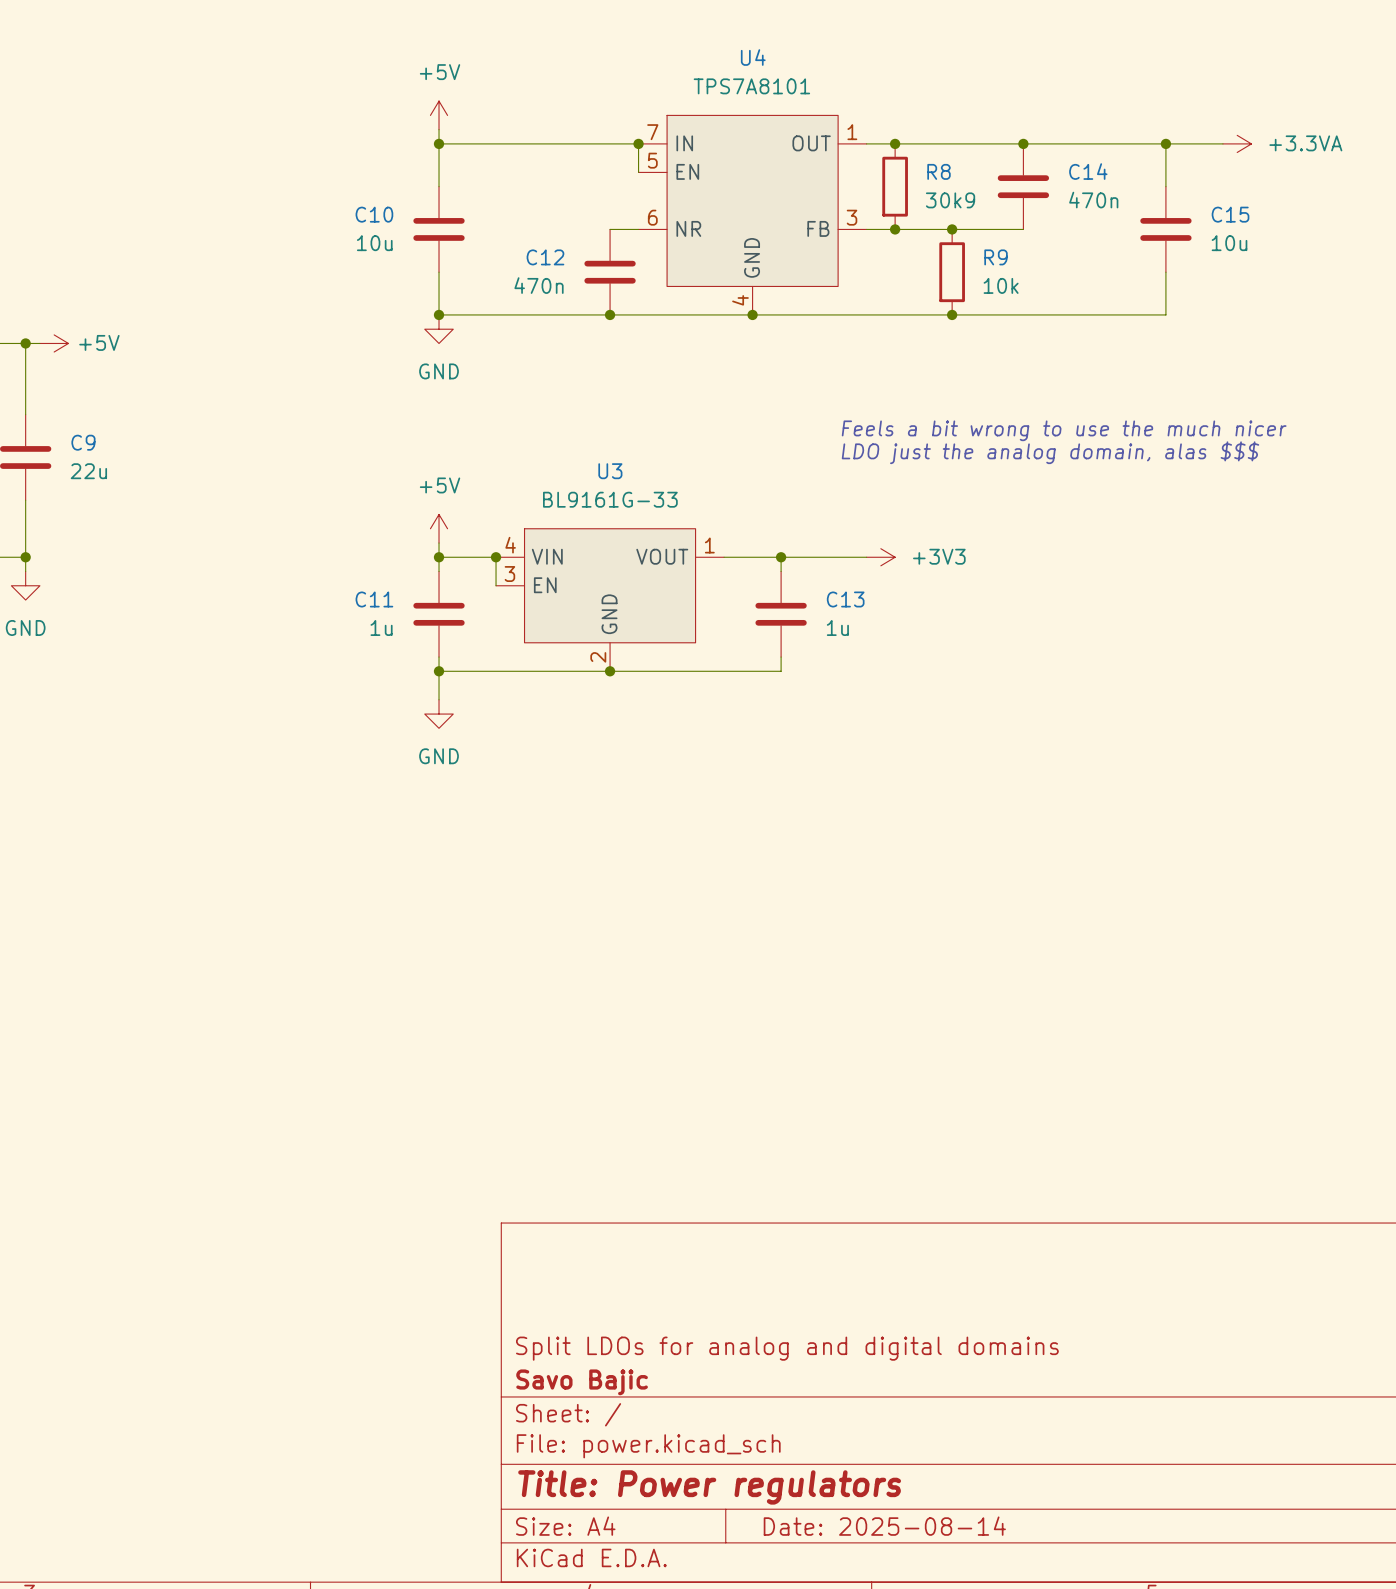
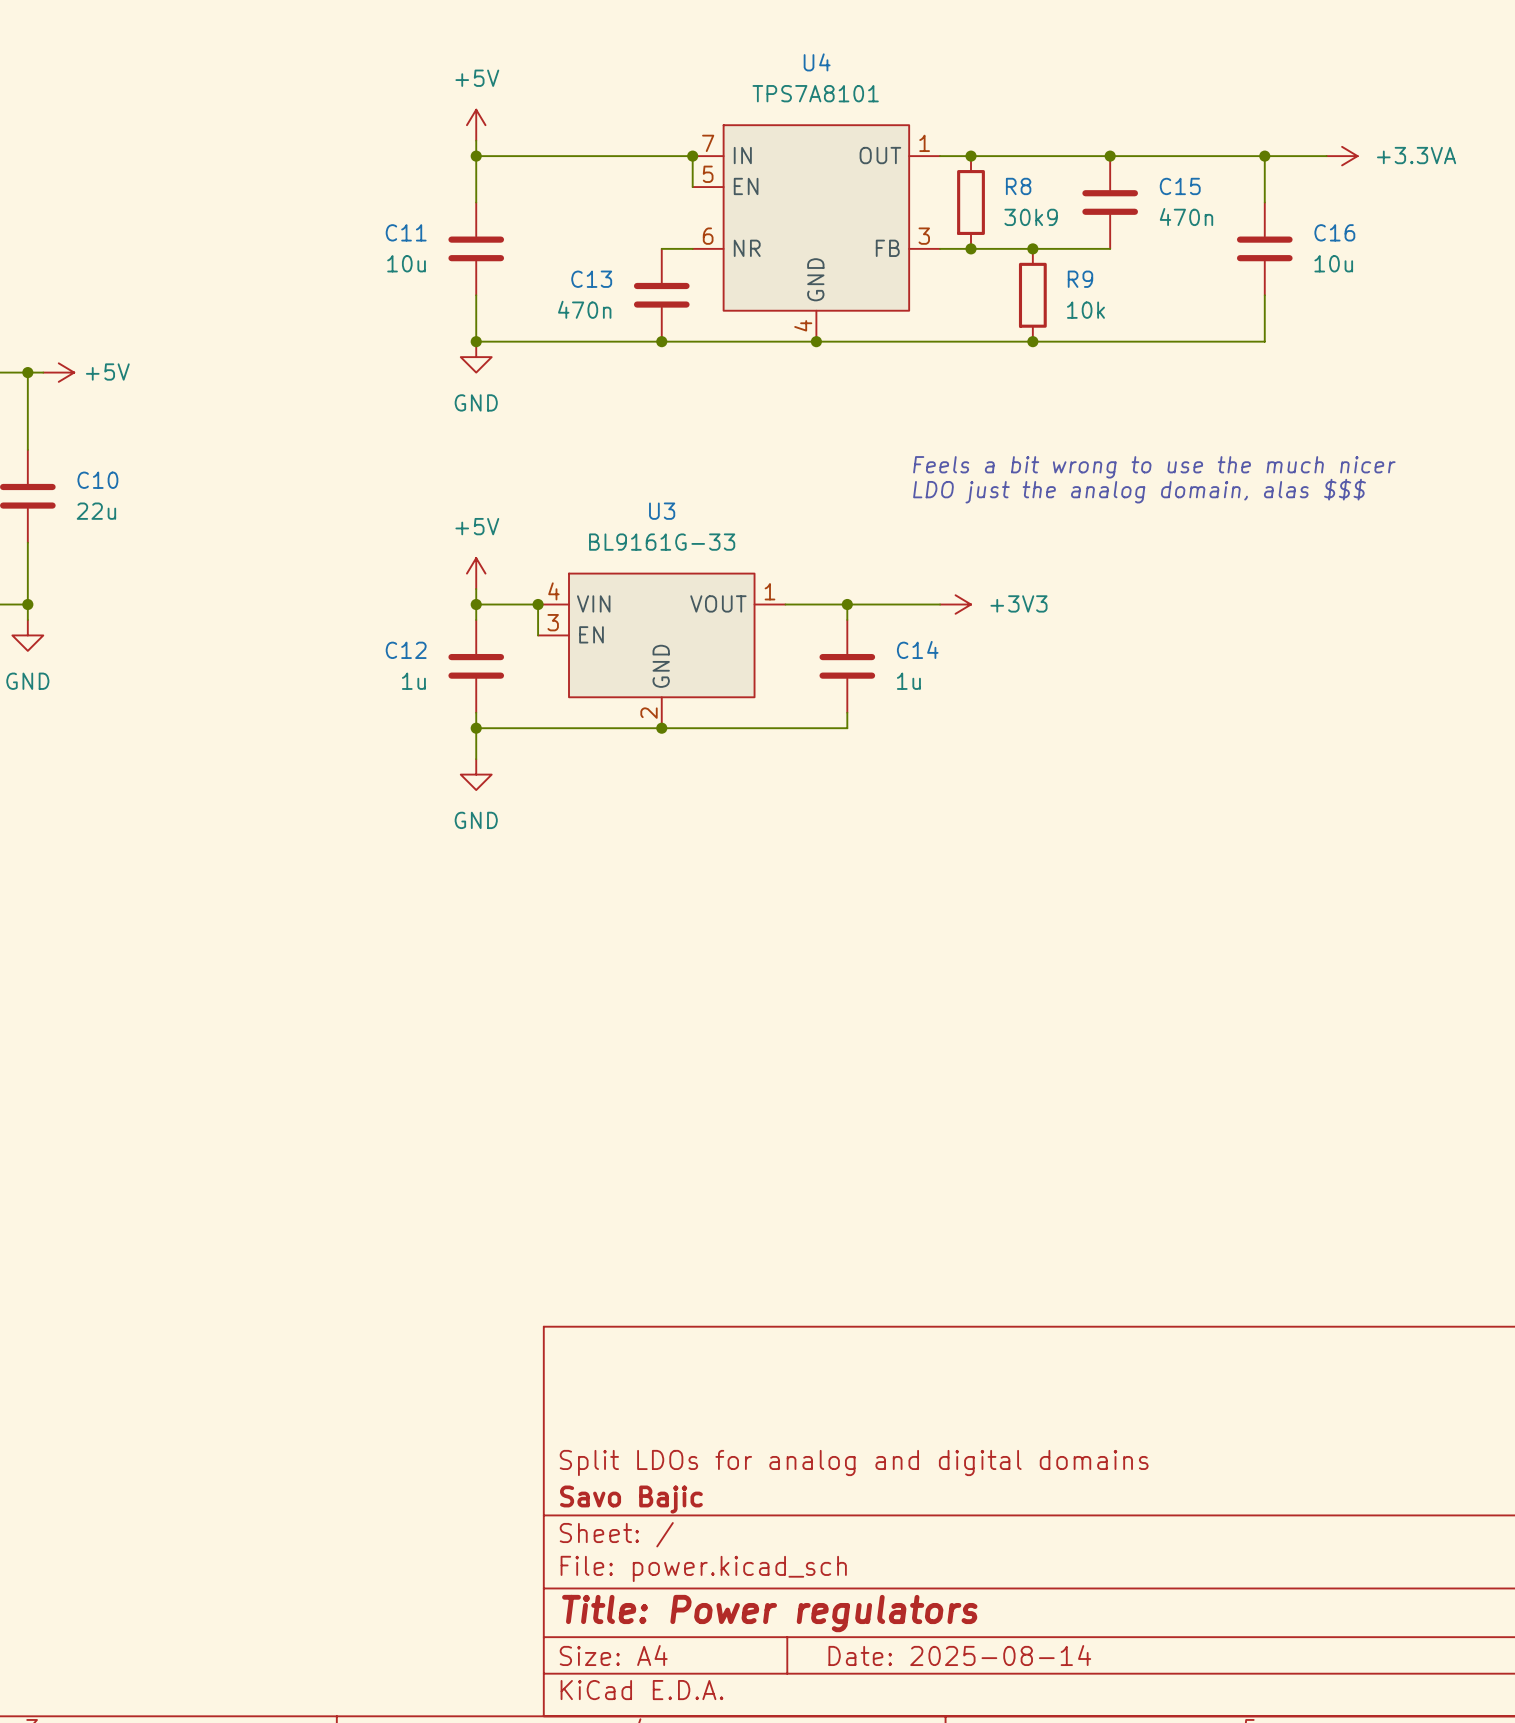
C14 name: C14 (1088, 171) -> C15 (1180, 186)
C10 name: C10 (374, 214) -> C11 (406, 232)
C15 name: C15 (1230, 214) -> C16 (1334, 232)
C12 name: C12 (545, 257) -> C13 (591, 279)
C9 name: C9 (83, 442) -> C10 (97, 480)
C11 name: C11 (374, 599) -> C12 (406, 650)
C13 name: C13 (845, 599) -> C14 (917, 649)

